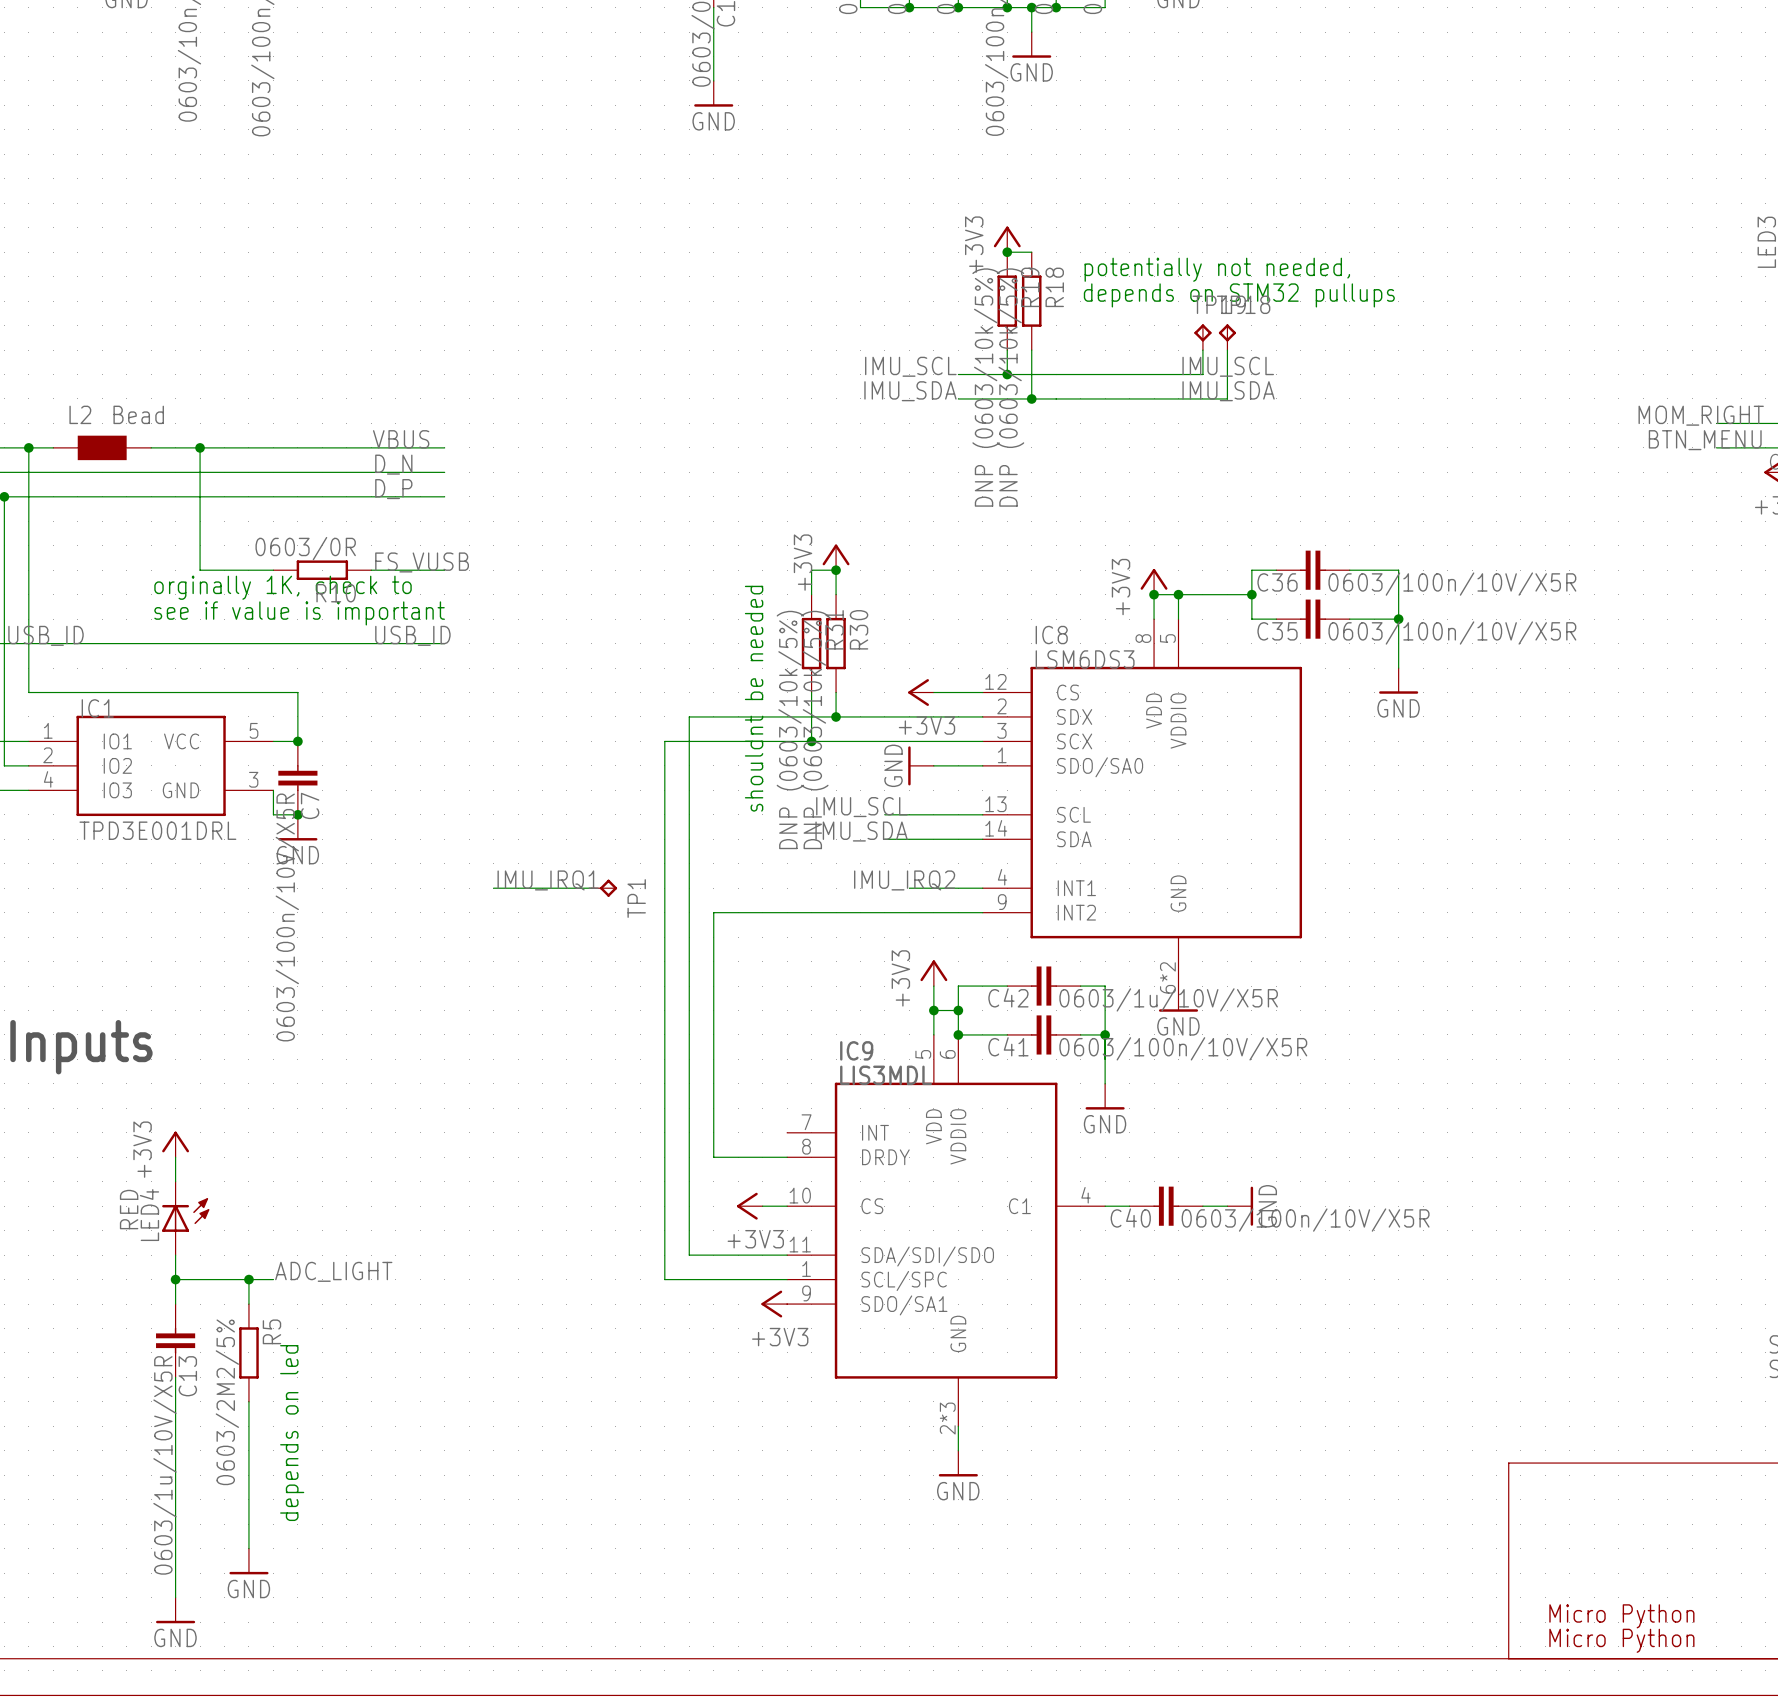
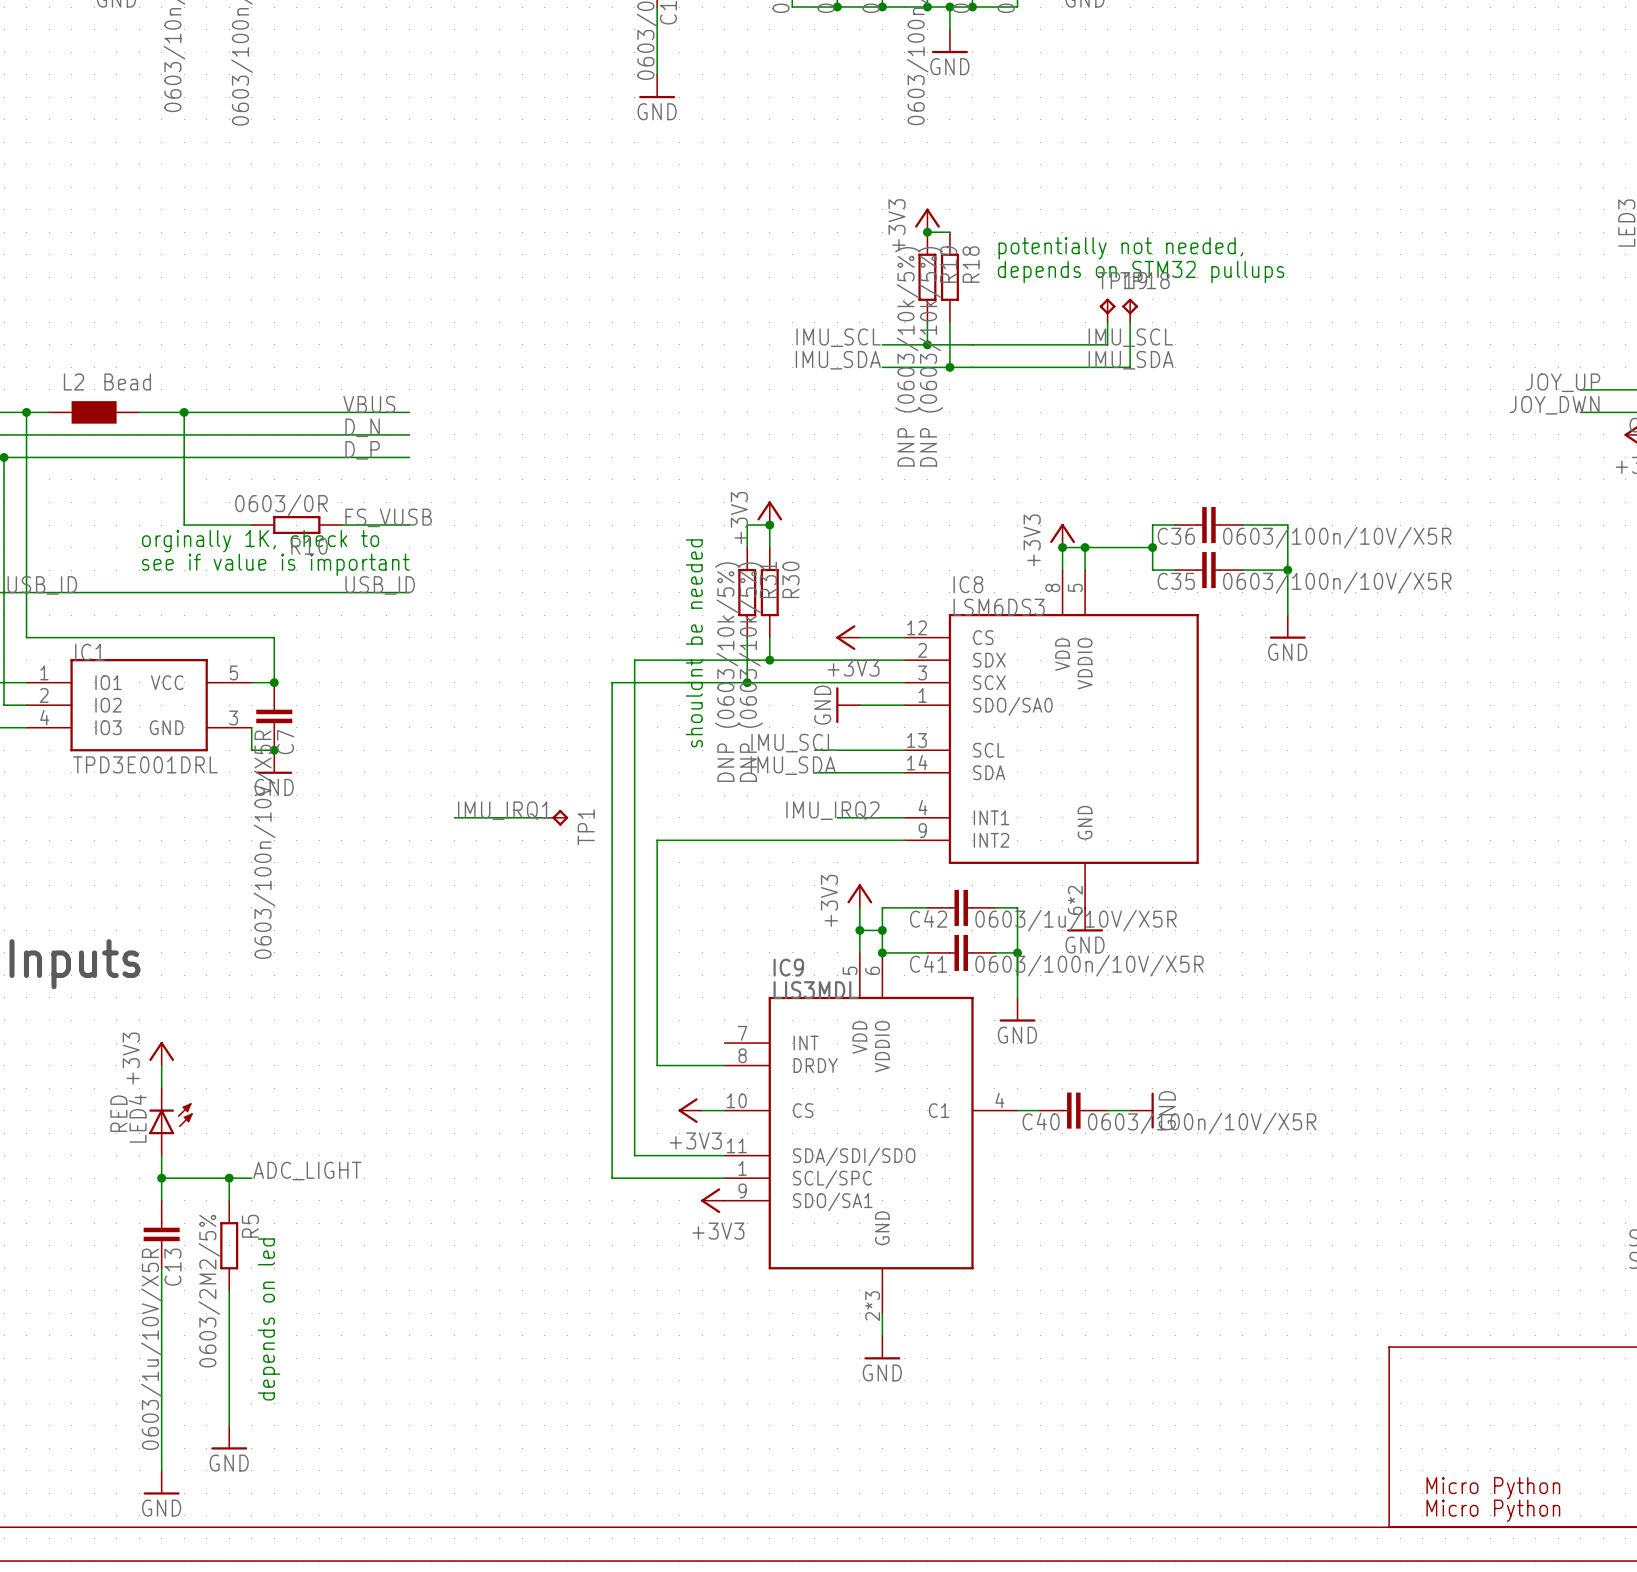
label: none -> JOY_UP (1563, 382)
label: MOM_RIGHT (1701, 415) -> none
label: none -> JOY_DWN (1554, 405)
label: BTN_MENU (1705, 440) -> none

